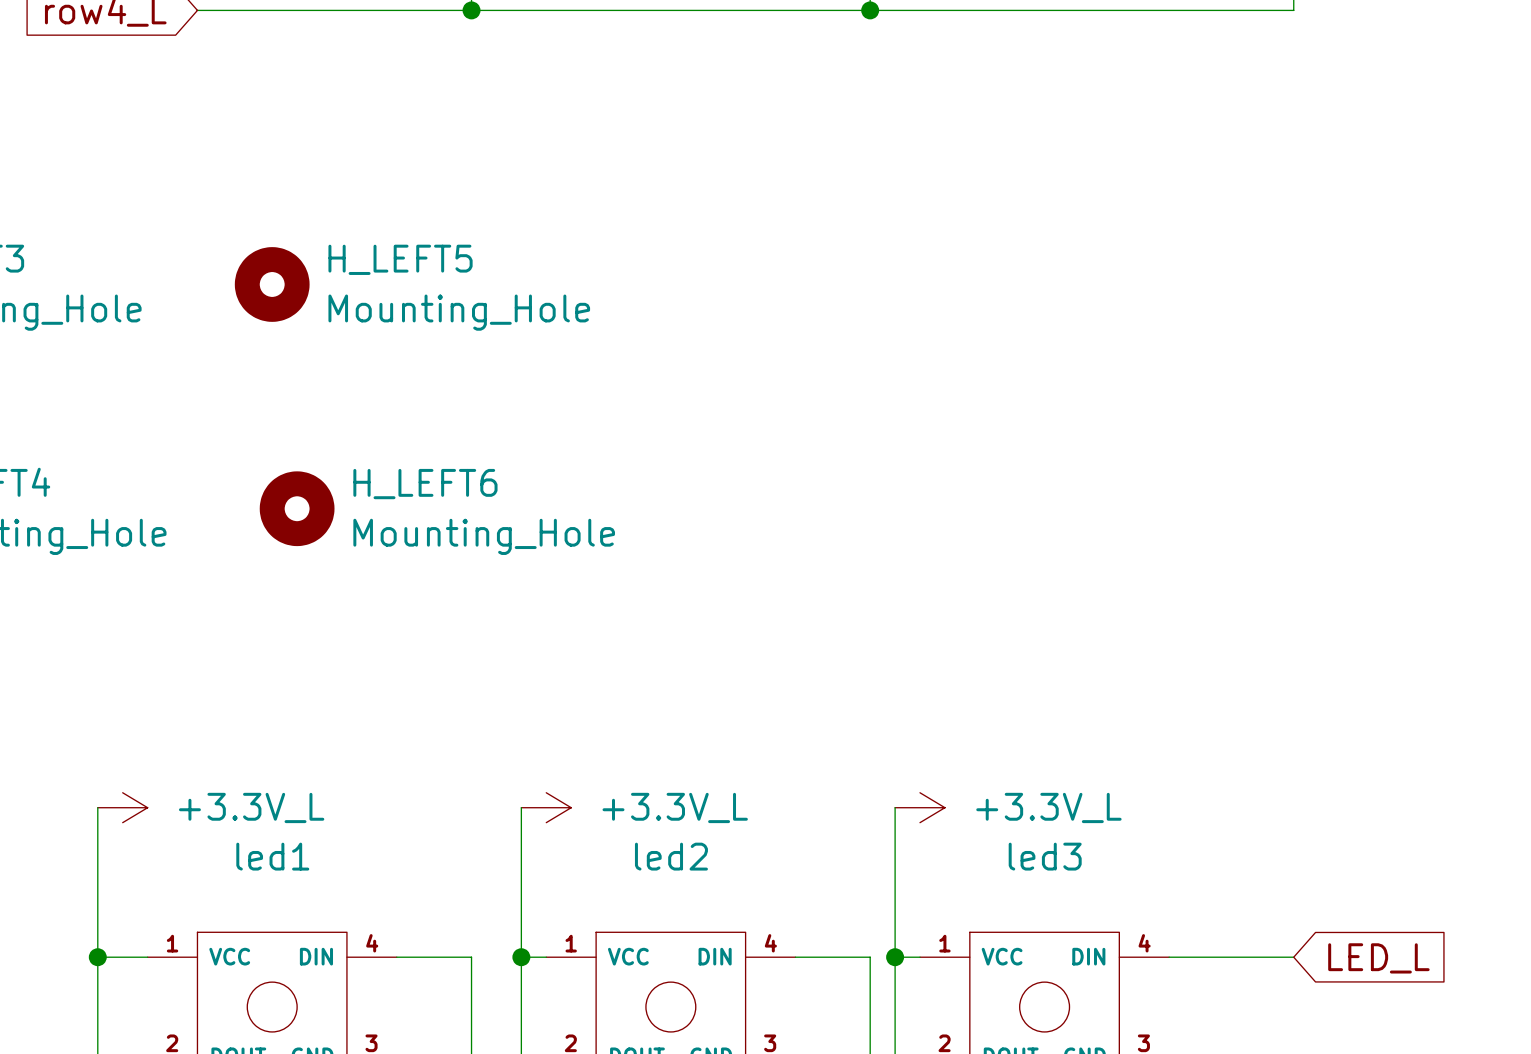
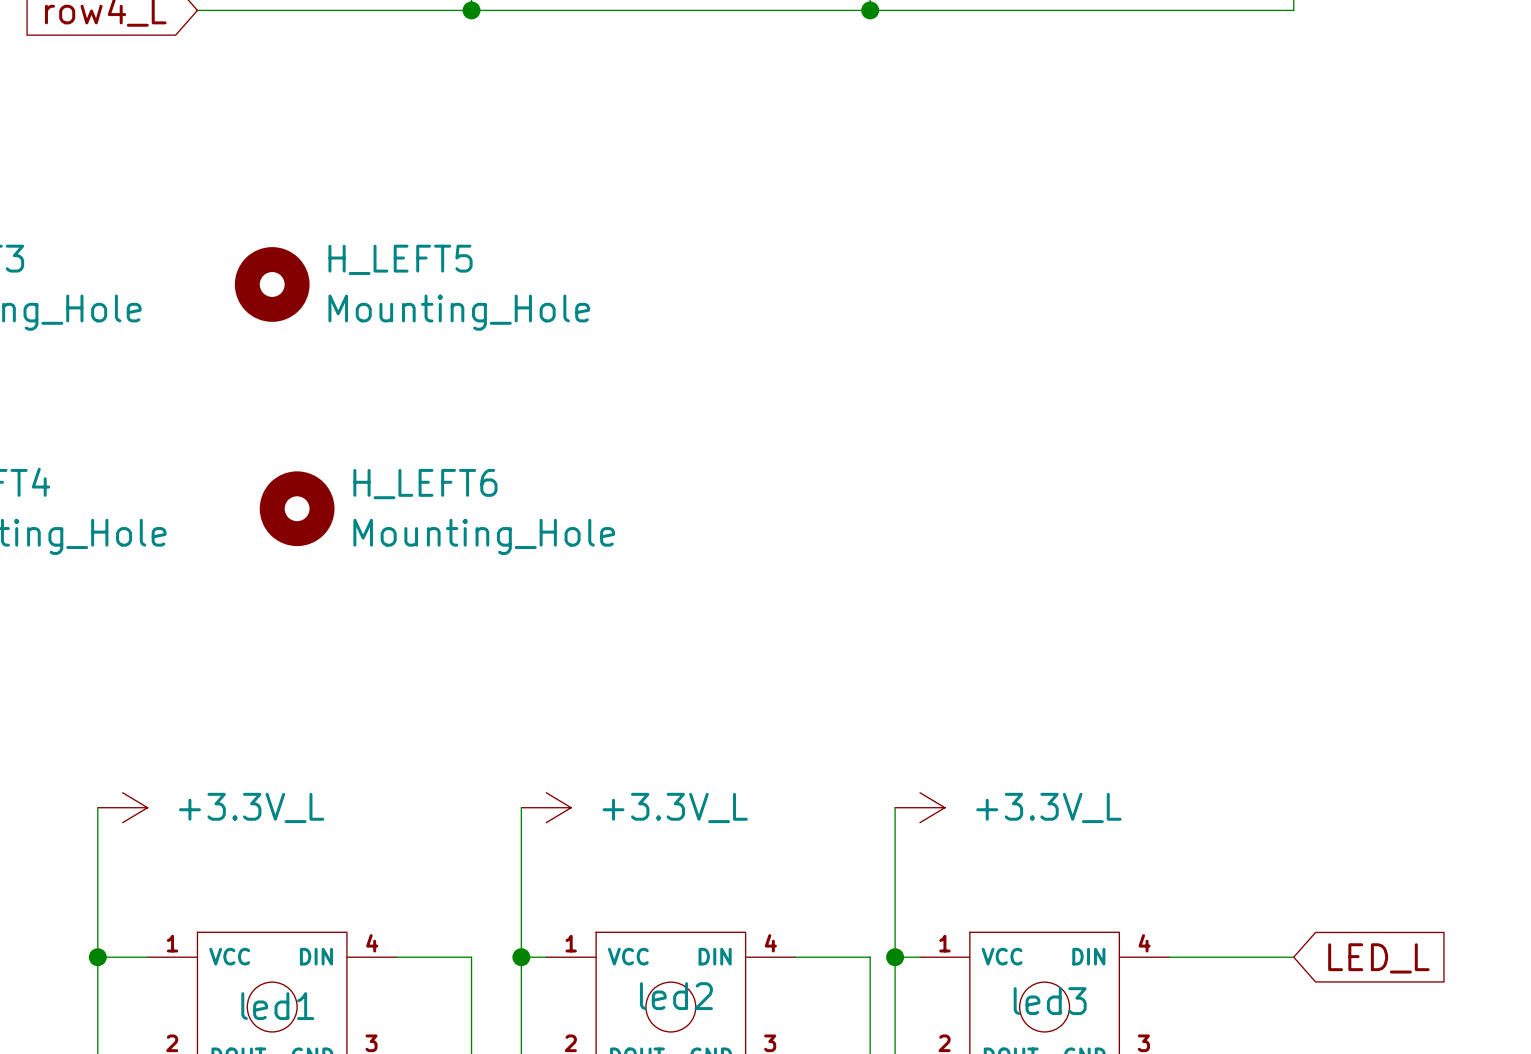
led1 name position: led1 (272, 856) -> led1 (277, 1006)
led2 name position: led2 (671, 856) -> led2 (676, 996)
led3 name position: led3 (1045, 856) -> led3 (1050, 1001)

